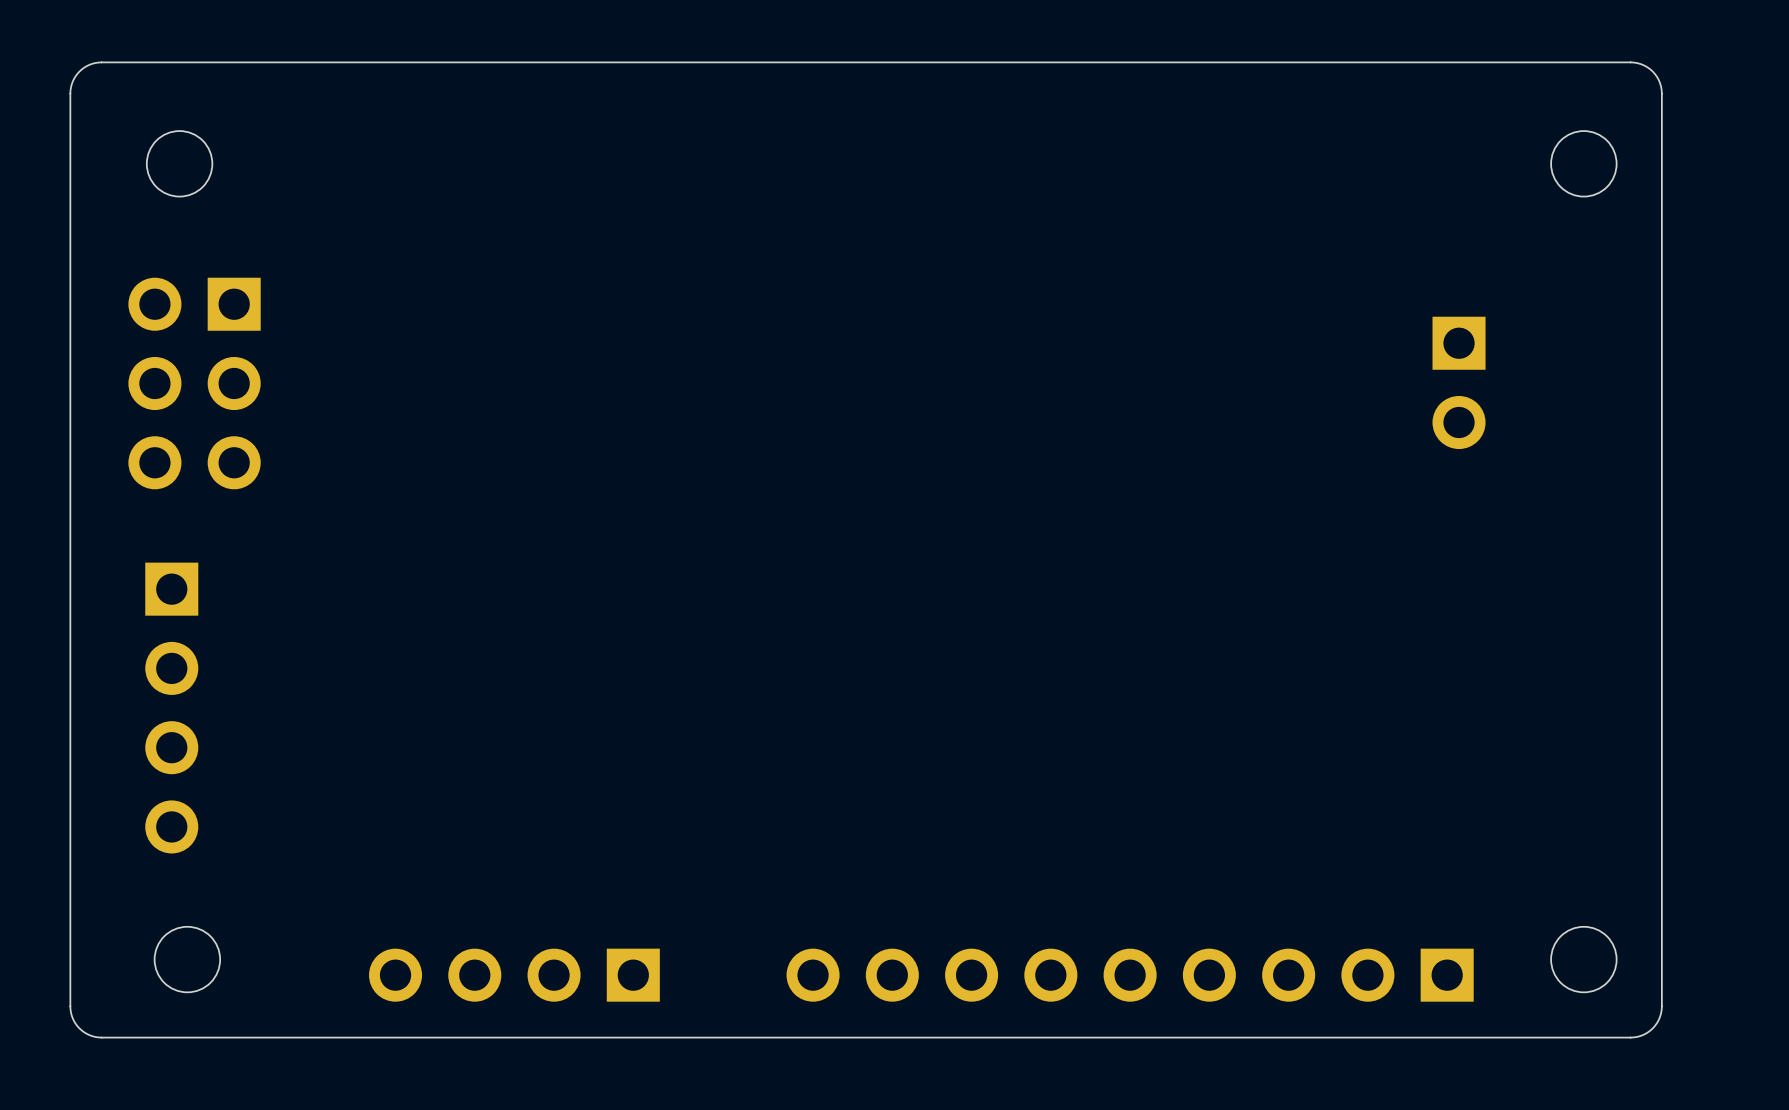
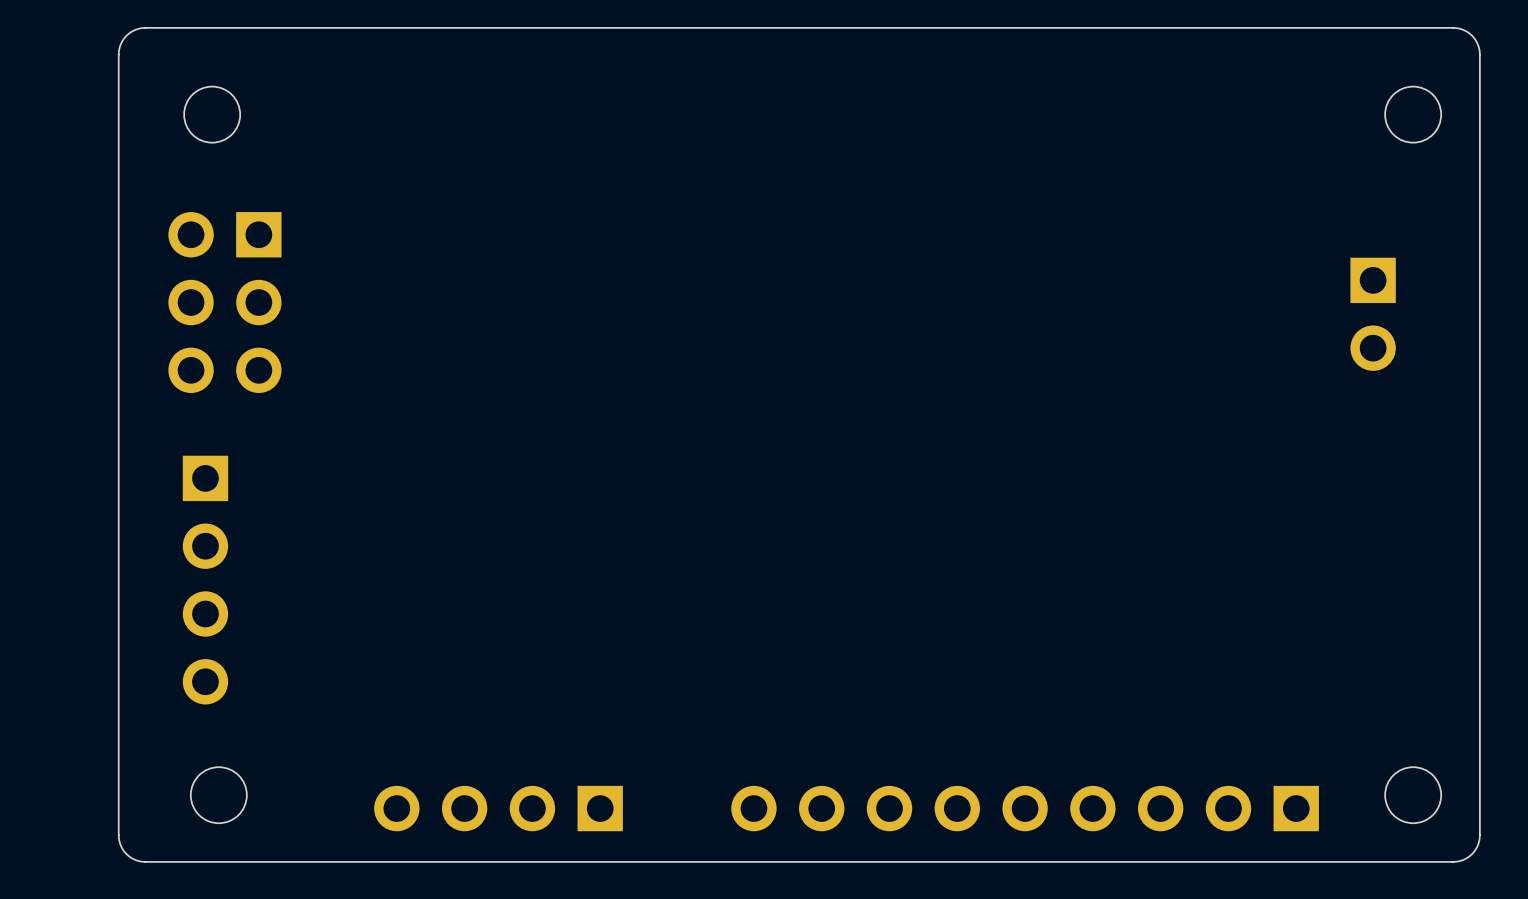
part position: (1459, 382) -> (1373, 314)

